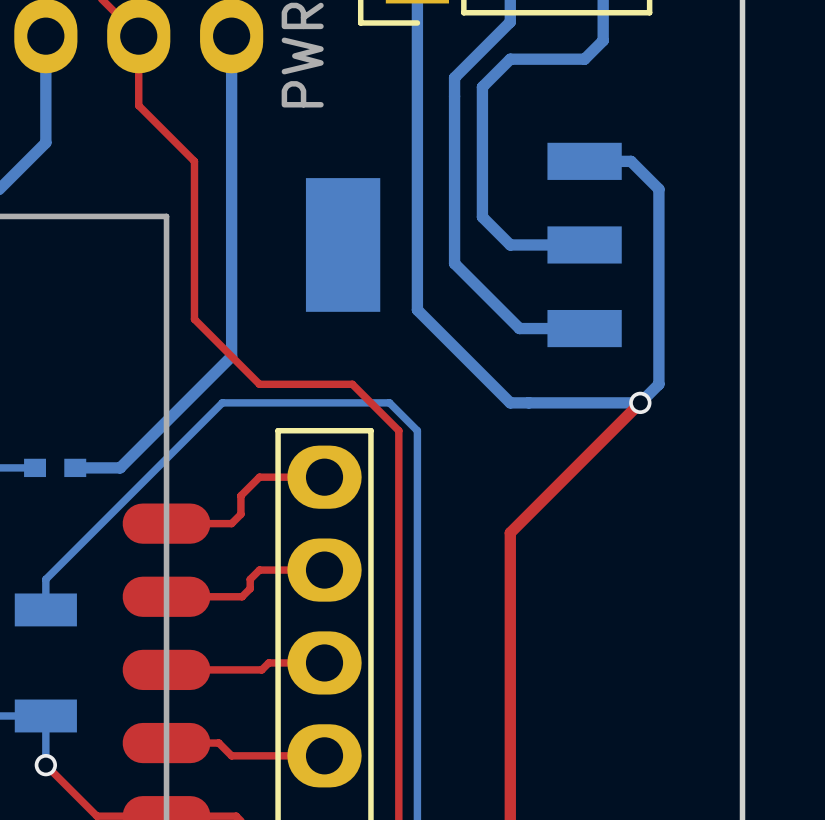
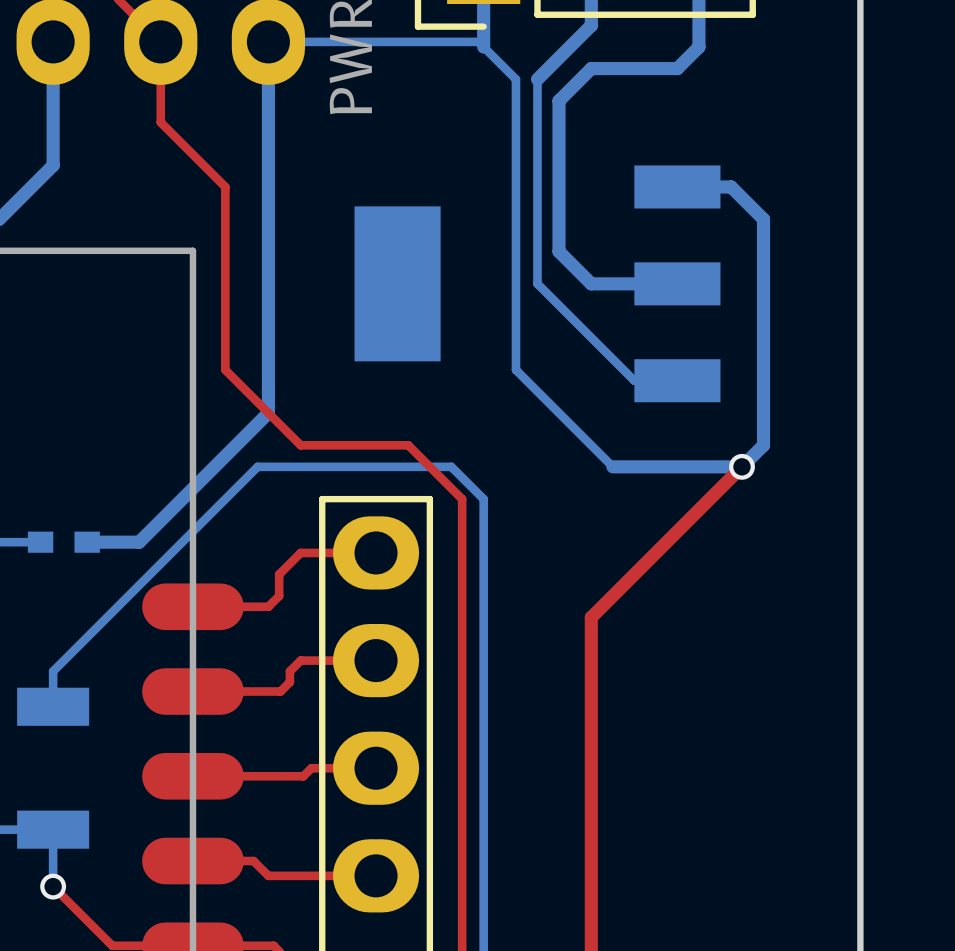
bottom track: (417, 40) (417, 309) (510, 402) (528, 402) -> (268, 41) (478, 41) (515, 79) (515, 369) (612, 466)
bottom track: (463, 68) (454, 77) (454, 263) (519, 328) (584, 328) -> (537, 79) (537, 283) (634, 380)

